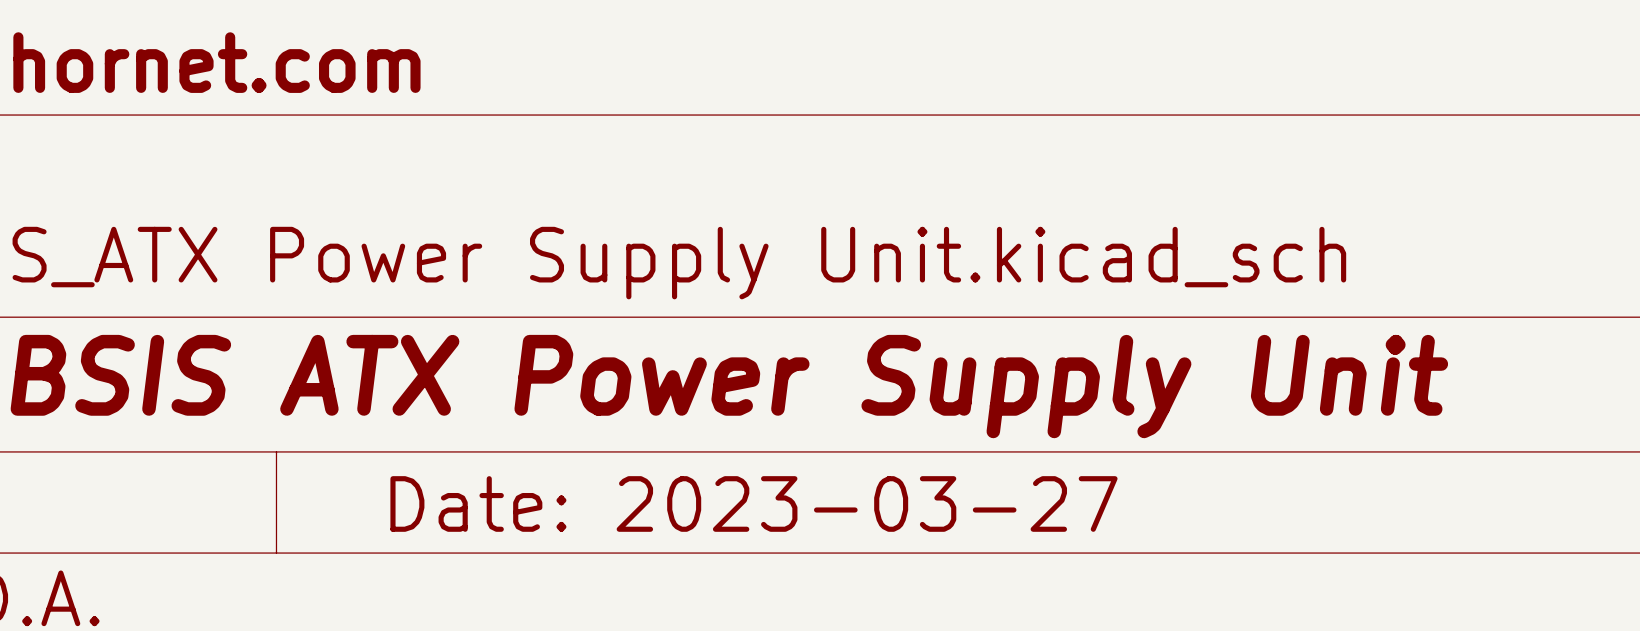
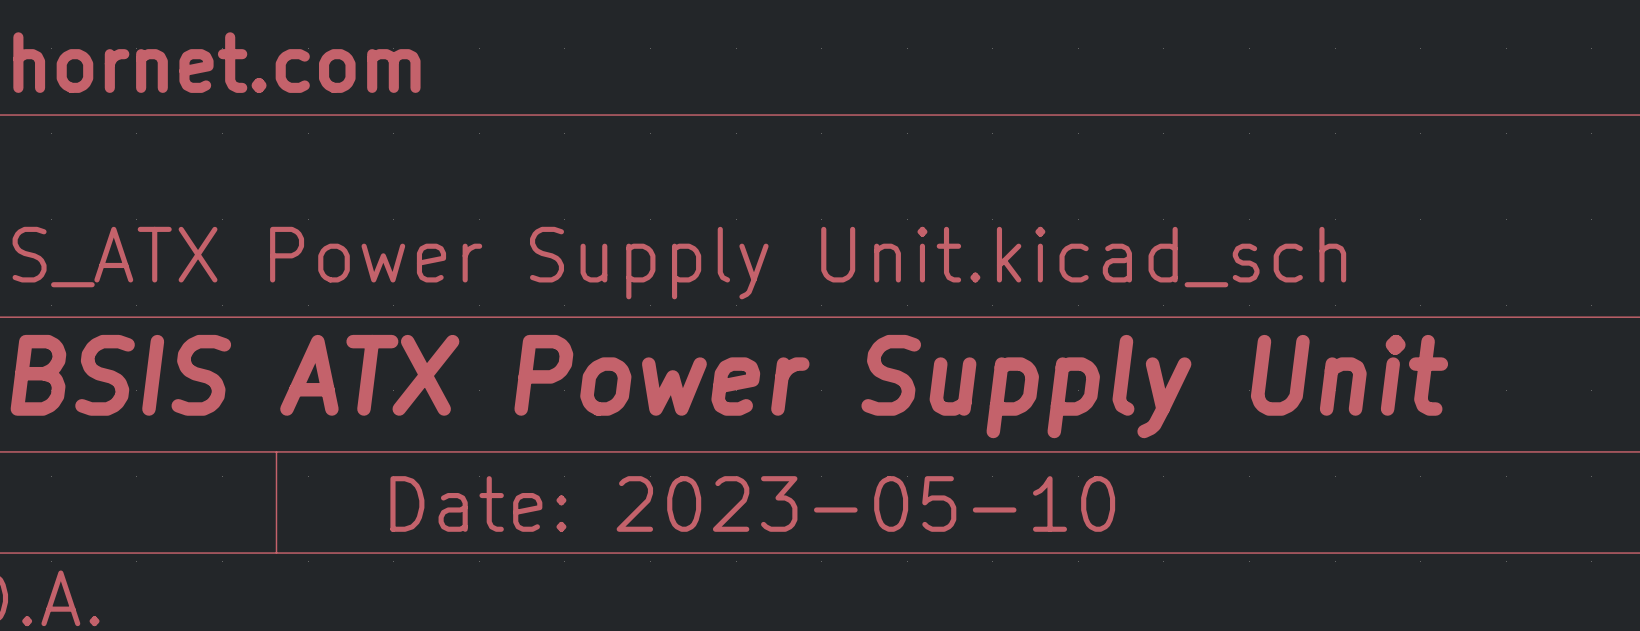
title block: Date: 2023-03-27 (753, 503) -> Date: 2023-05-10 (752, 503)

